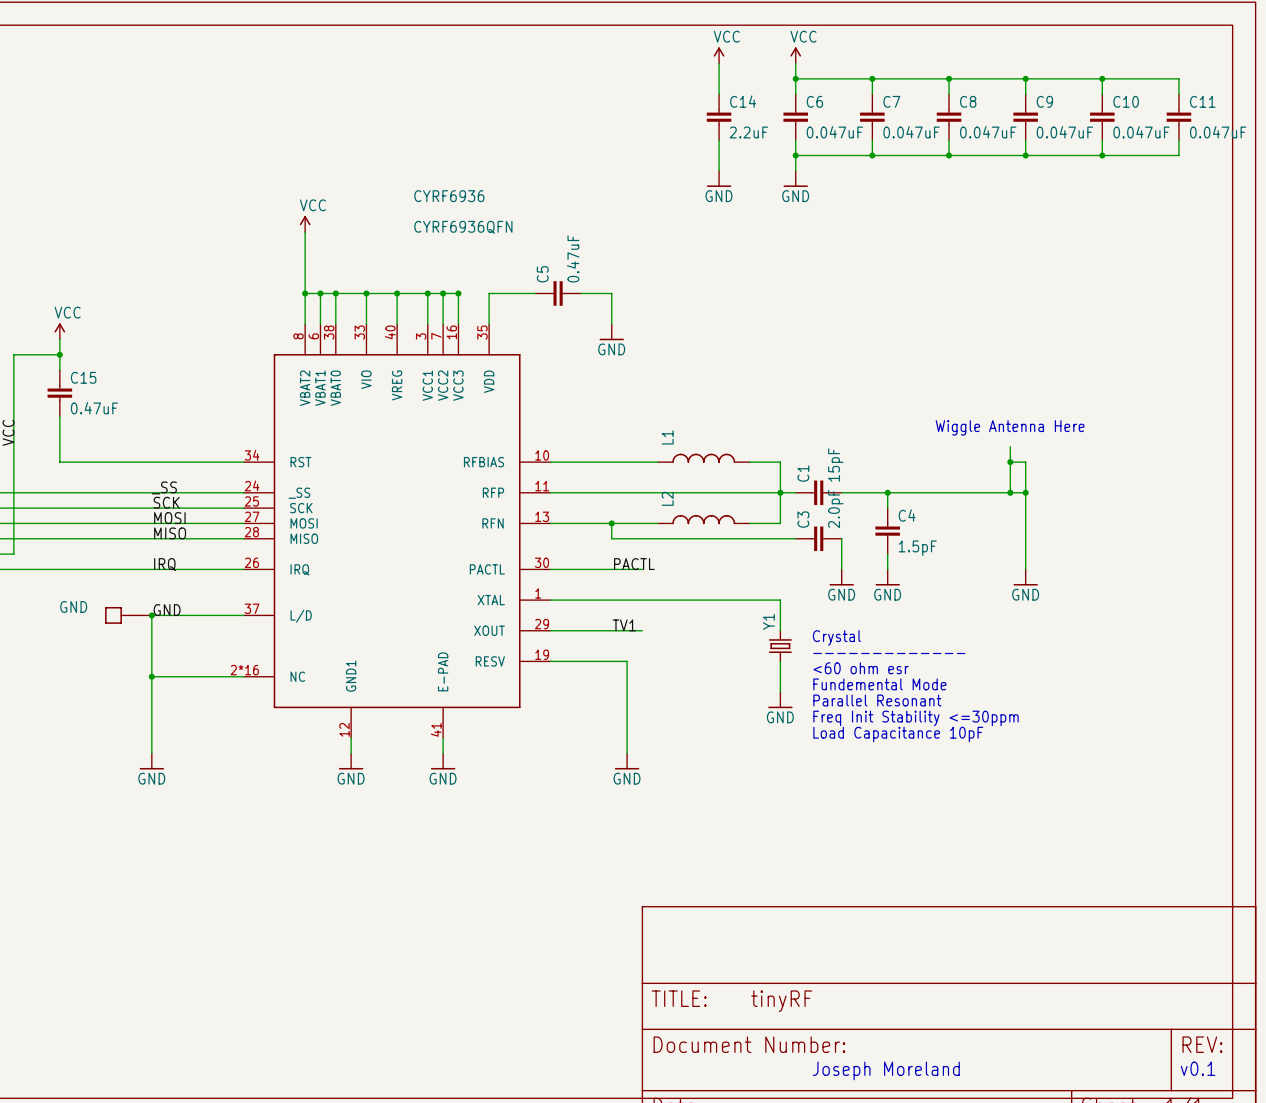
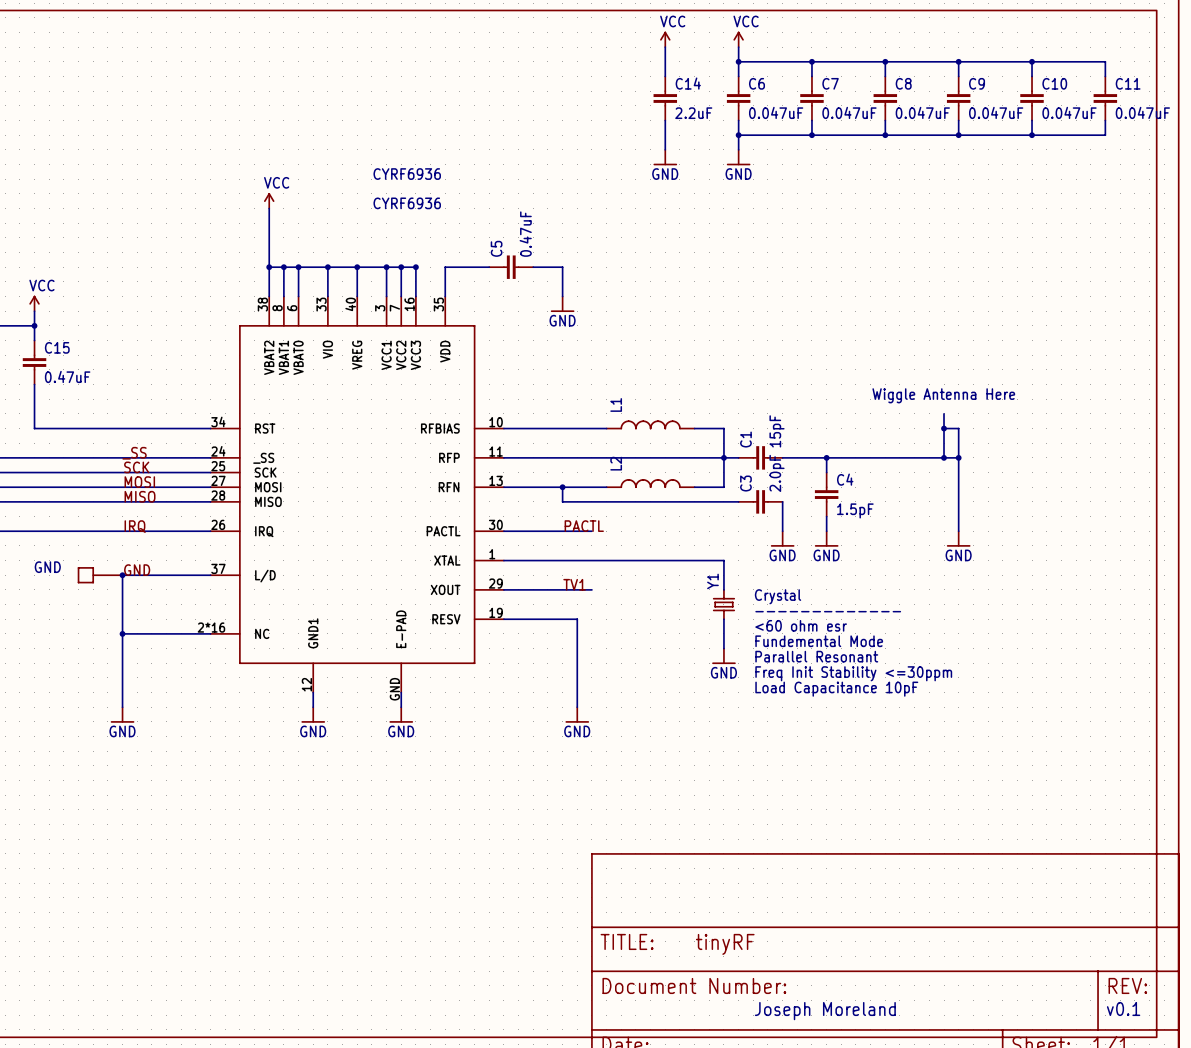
CYRF6936 value: CYRF6936QFN (463, 227) -> CYRF6936 (407, 203)
CYRF6936 pin number: 38 (329, 332) -> 6 (292, 308)
CYRF6936 pin number: 8 (298, 336) -> 38 (262, 304)
CYRF6936 pin number: 6 (313, 336) -> 8 (277, 308)
CYRF6936 pin number: 41 (436, 729) -> GND (394, 689)

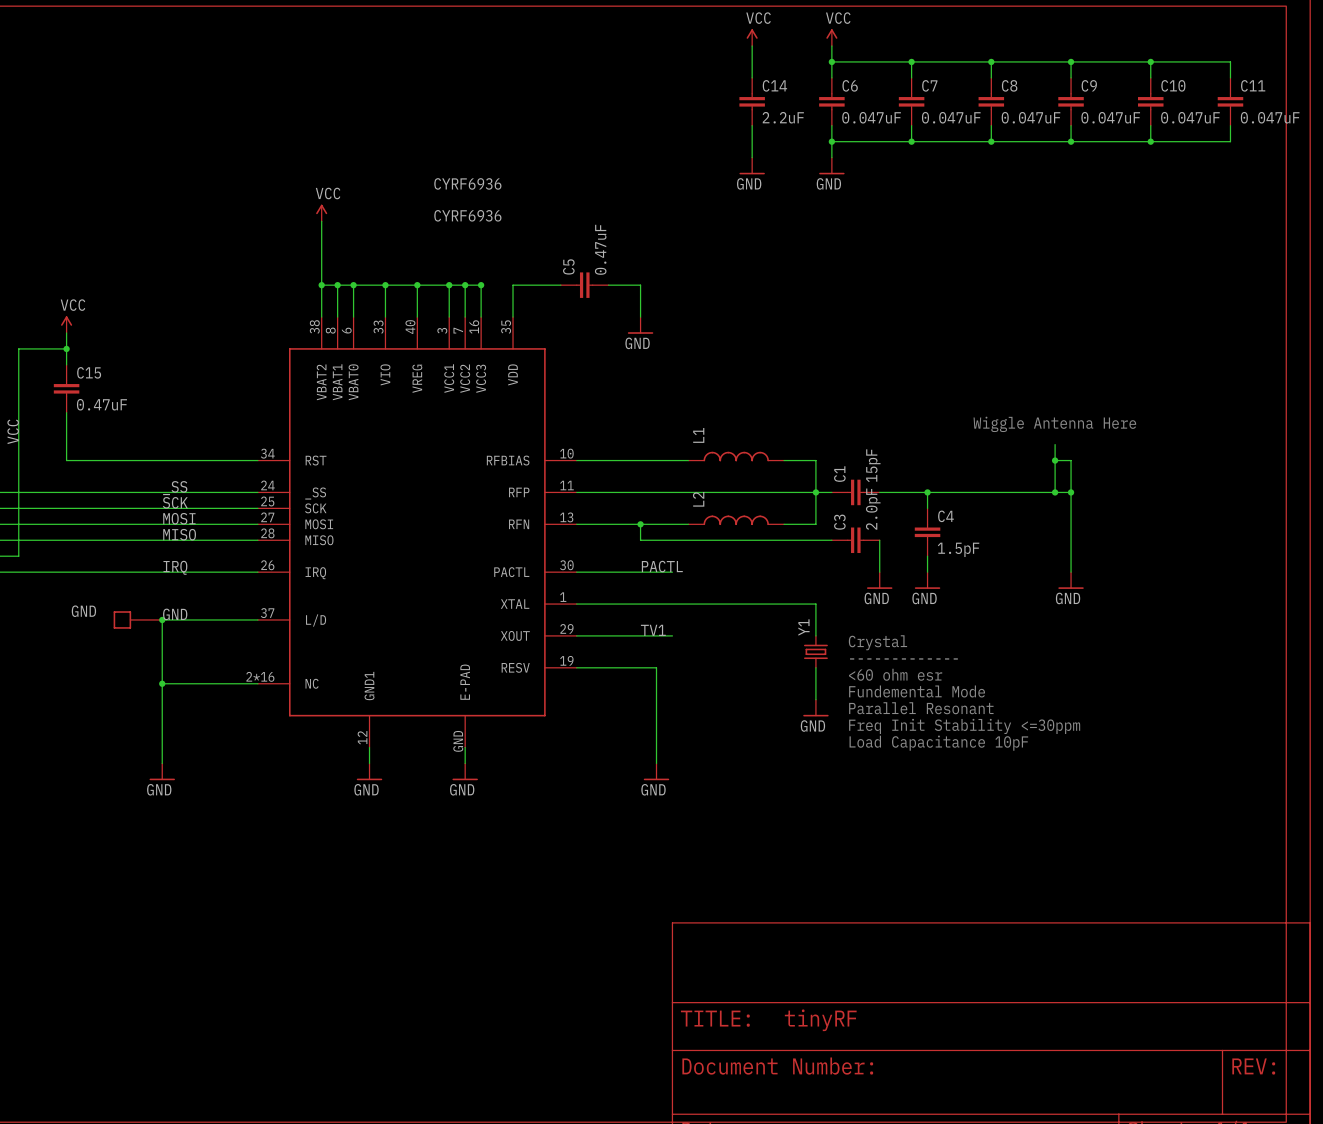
text: v0.1 (1123, 1009) -> none
text: Joseph Moreland (825, 1011) -> none

